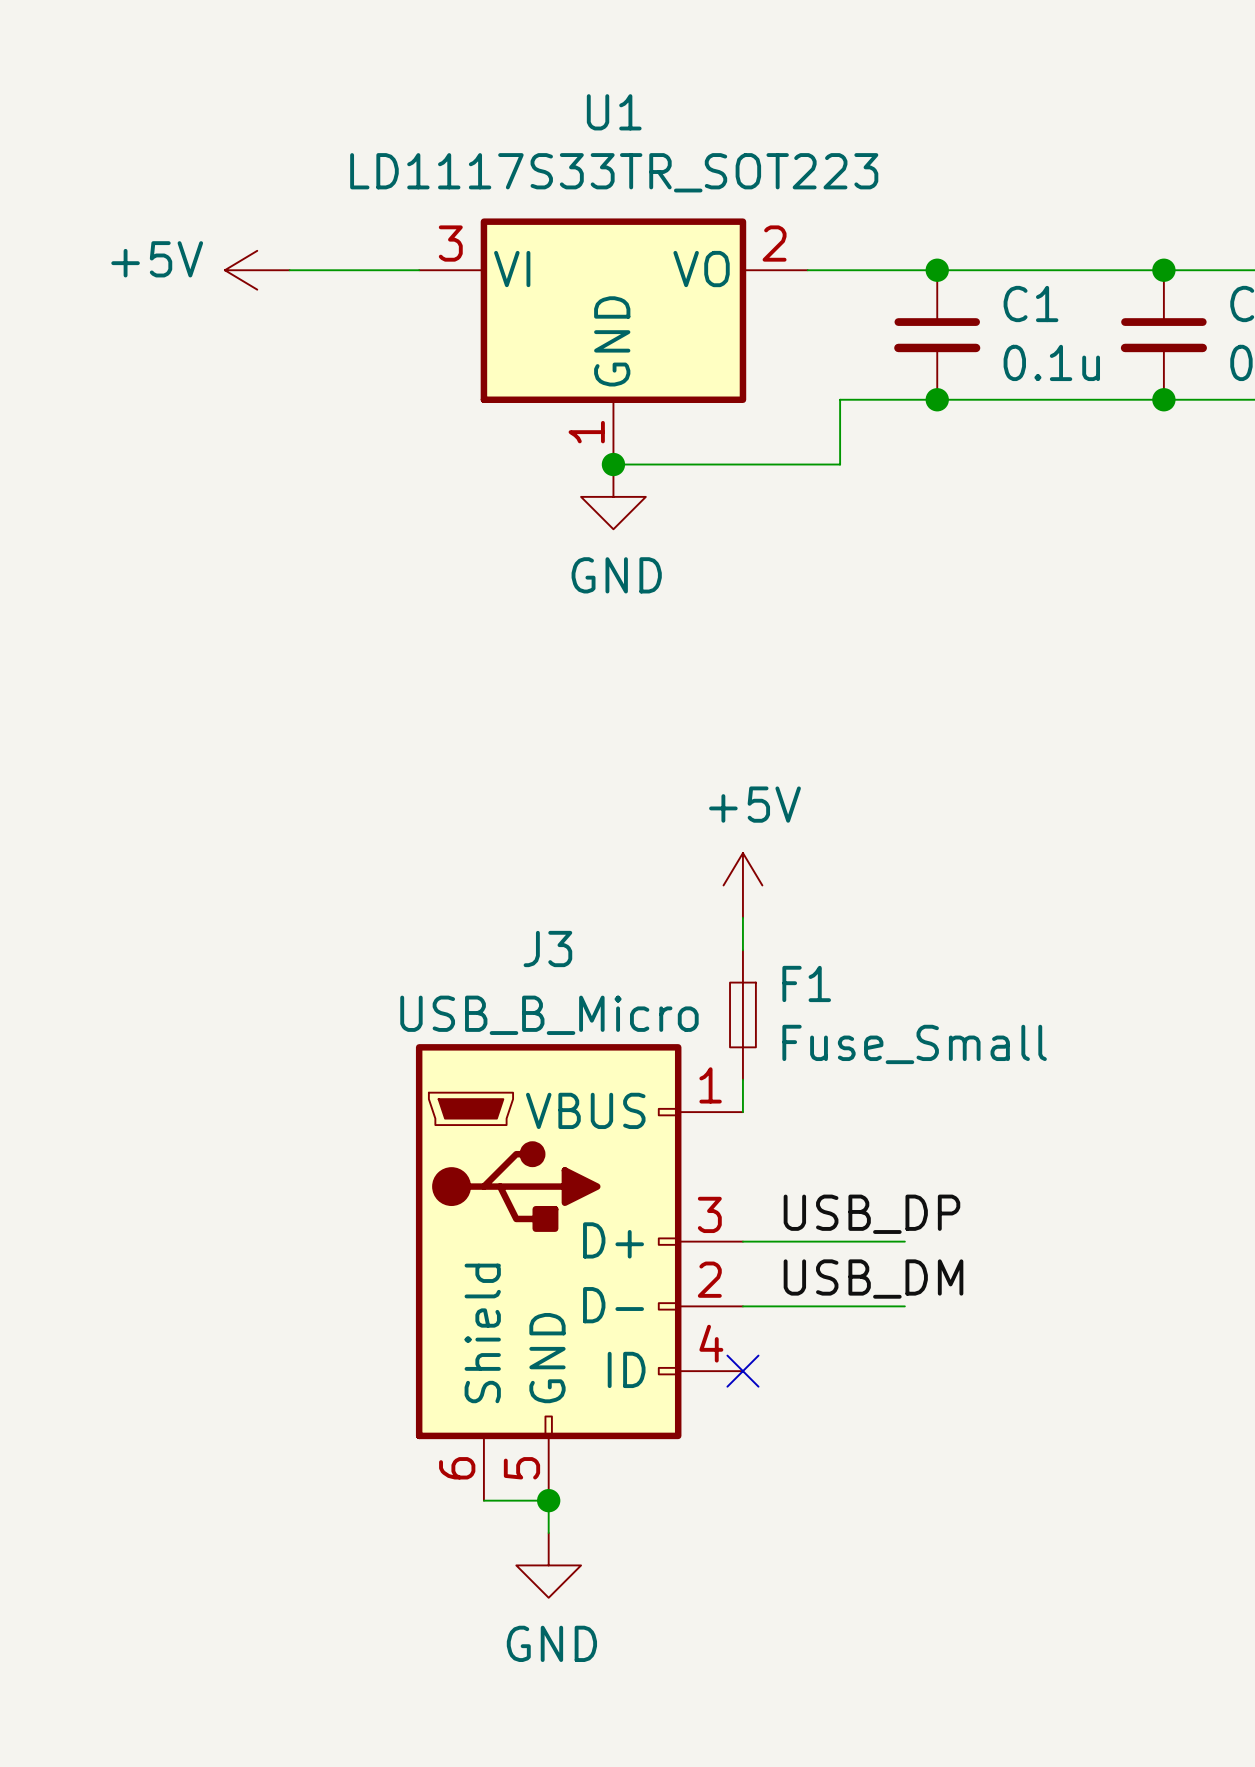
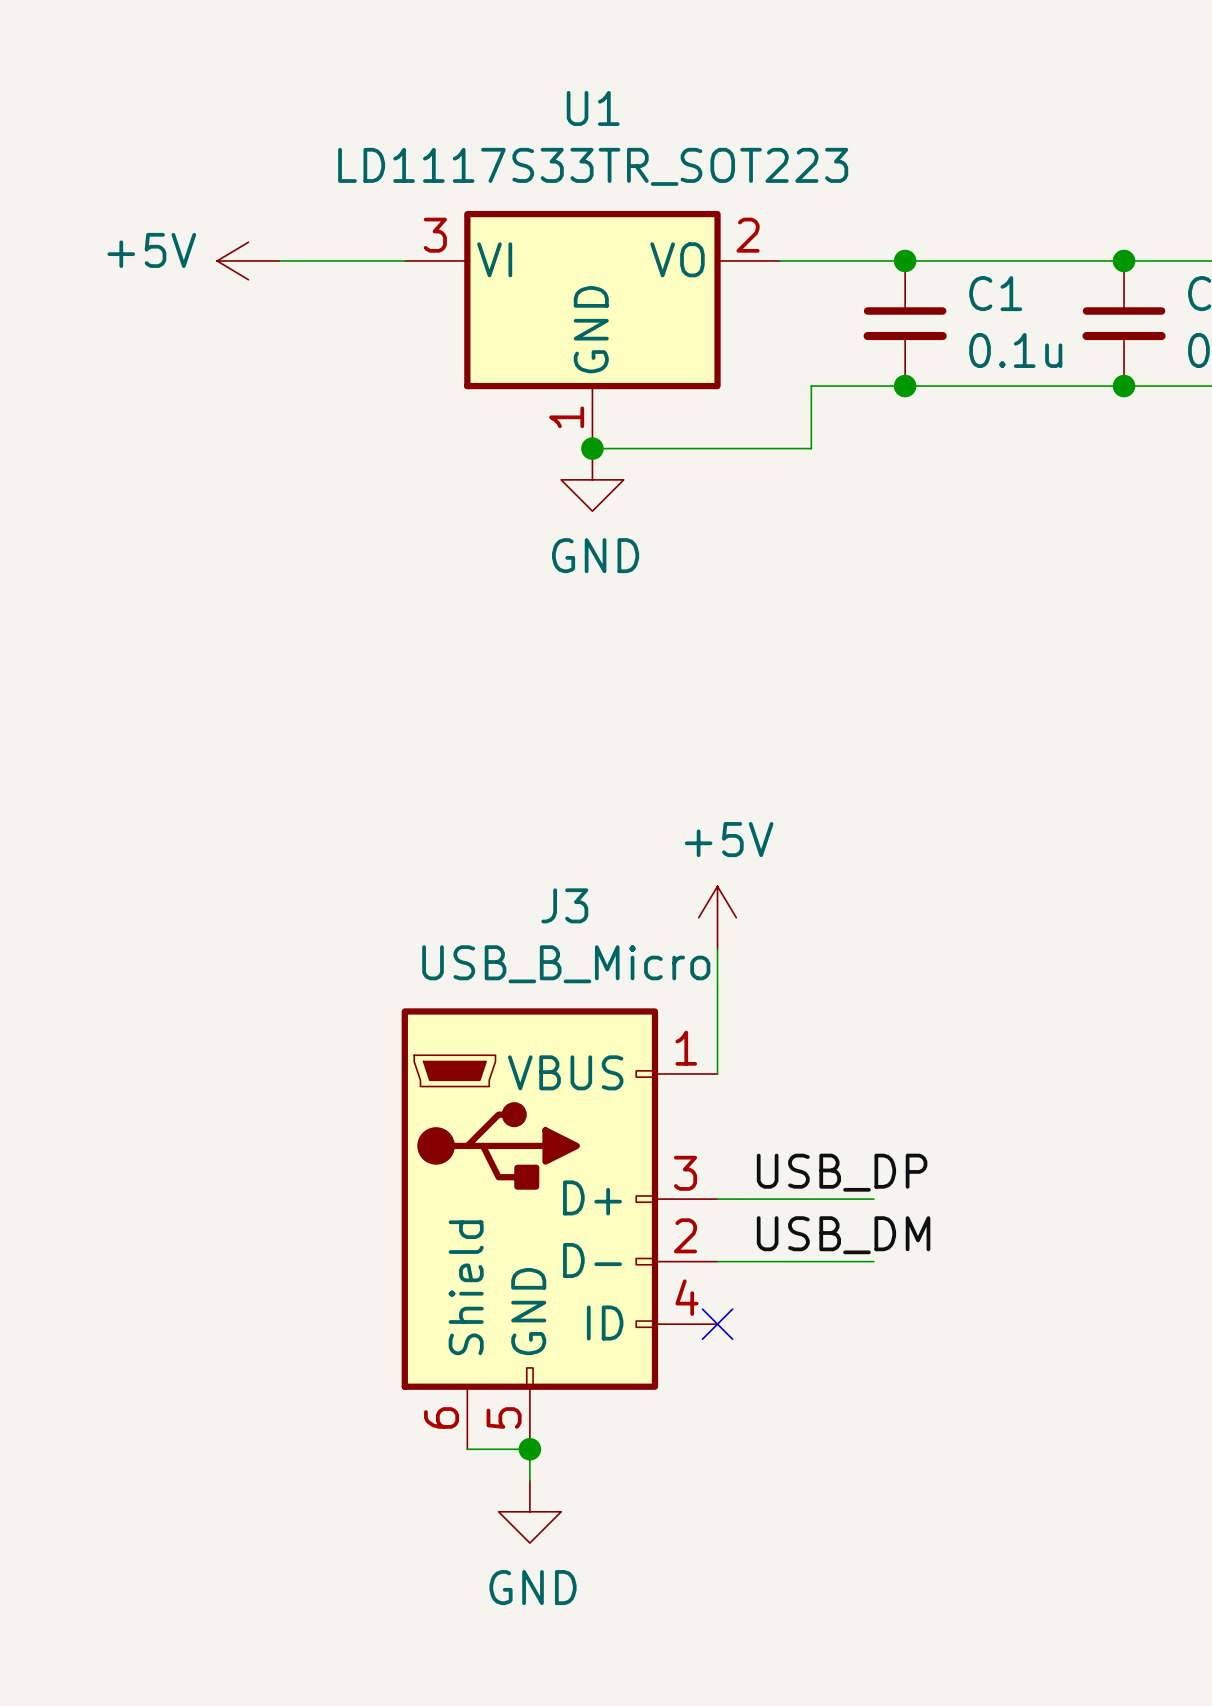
power symbol position: +5V (742, 885) -> +5V (717, 917)
J3 name position: J3 (547, 948) -> J3 (564, 905)
F1: Fuse_Small (742, 1014) -> none
J3 value position: USB_B_Micro (549, 1015) -> USB_B_Micro (566, 964)

